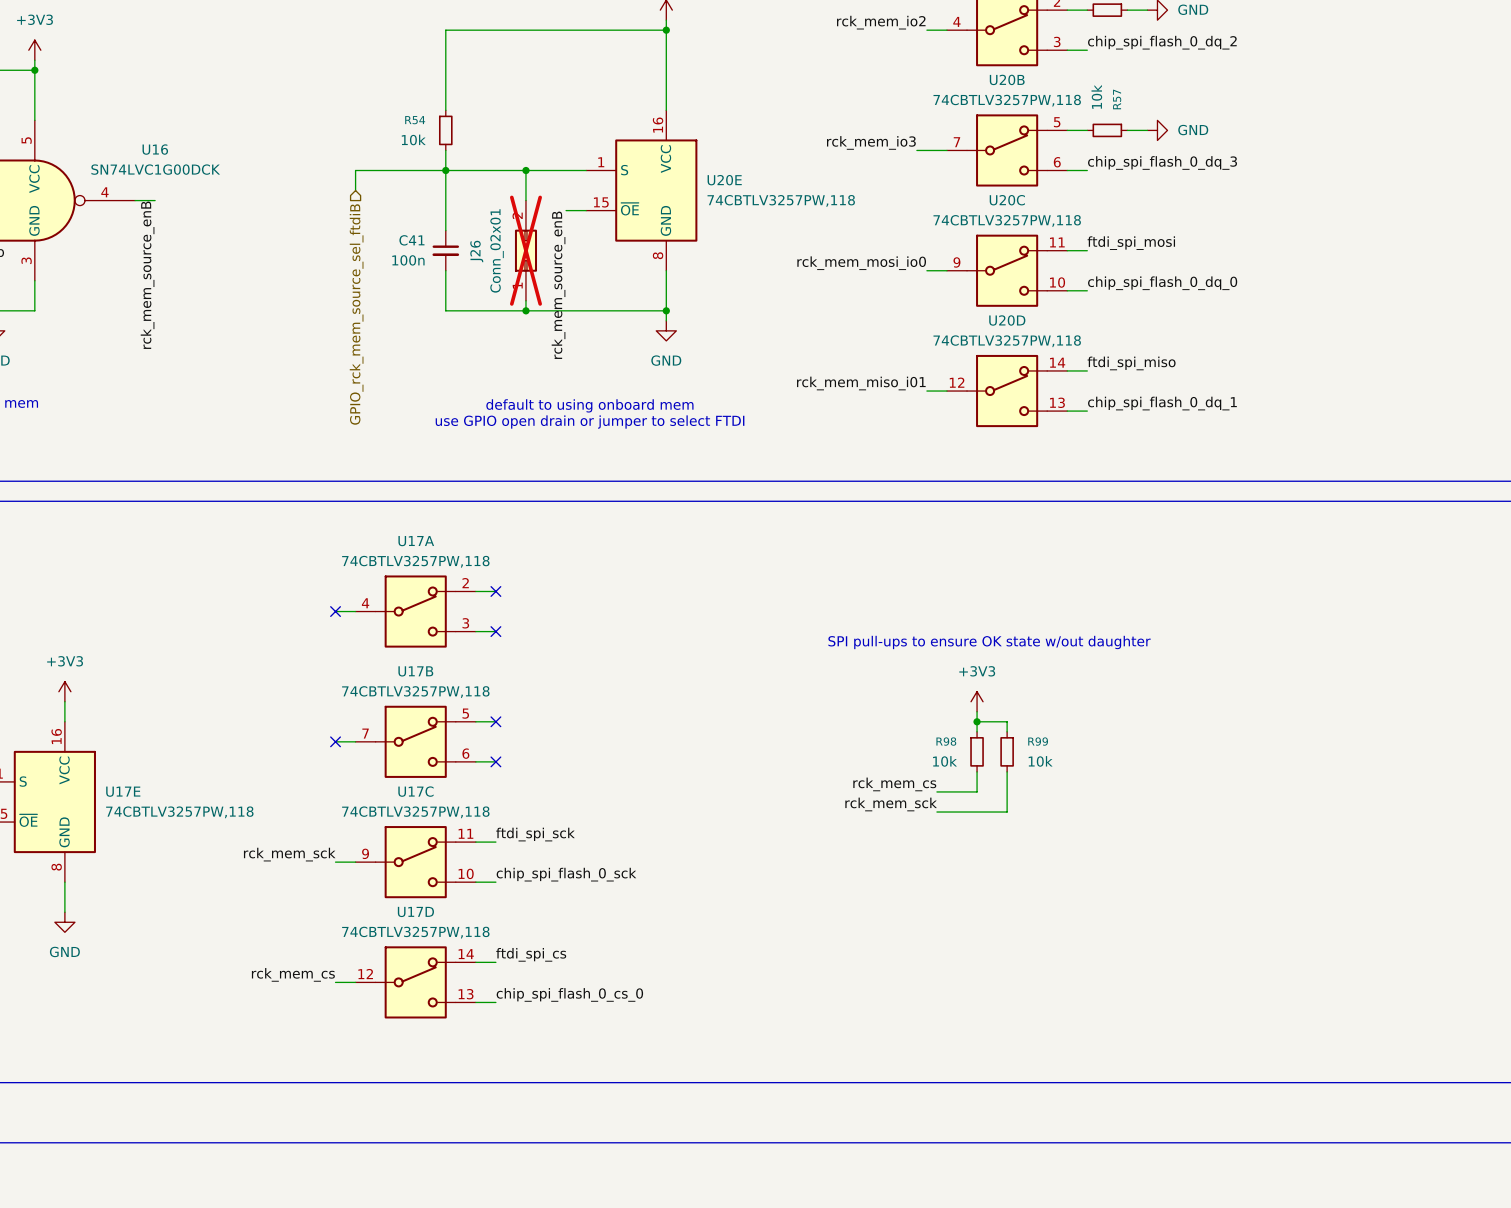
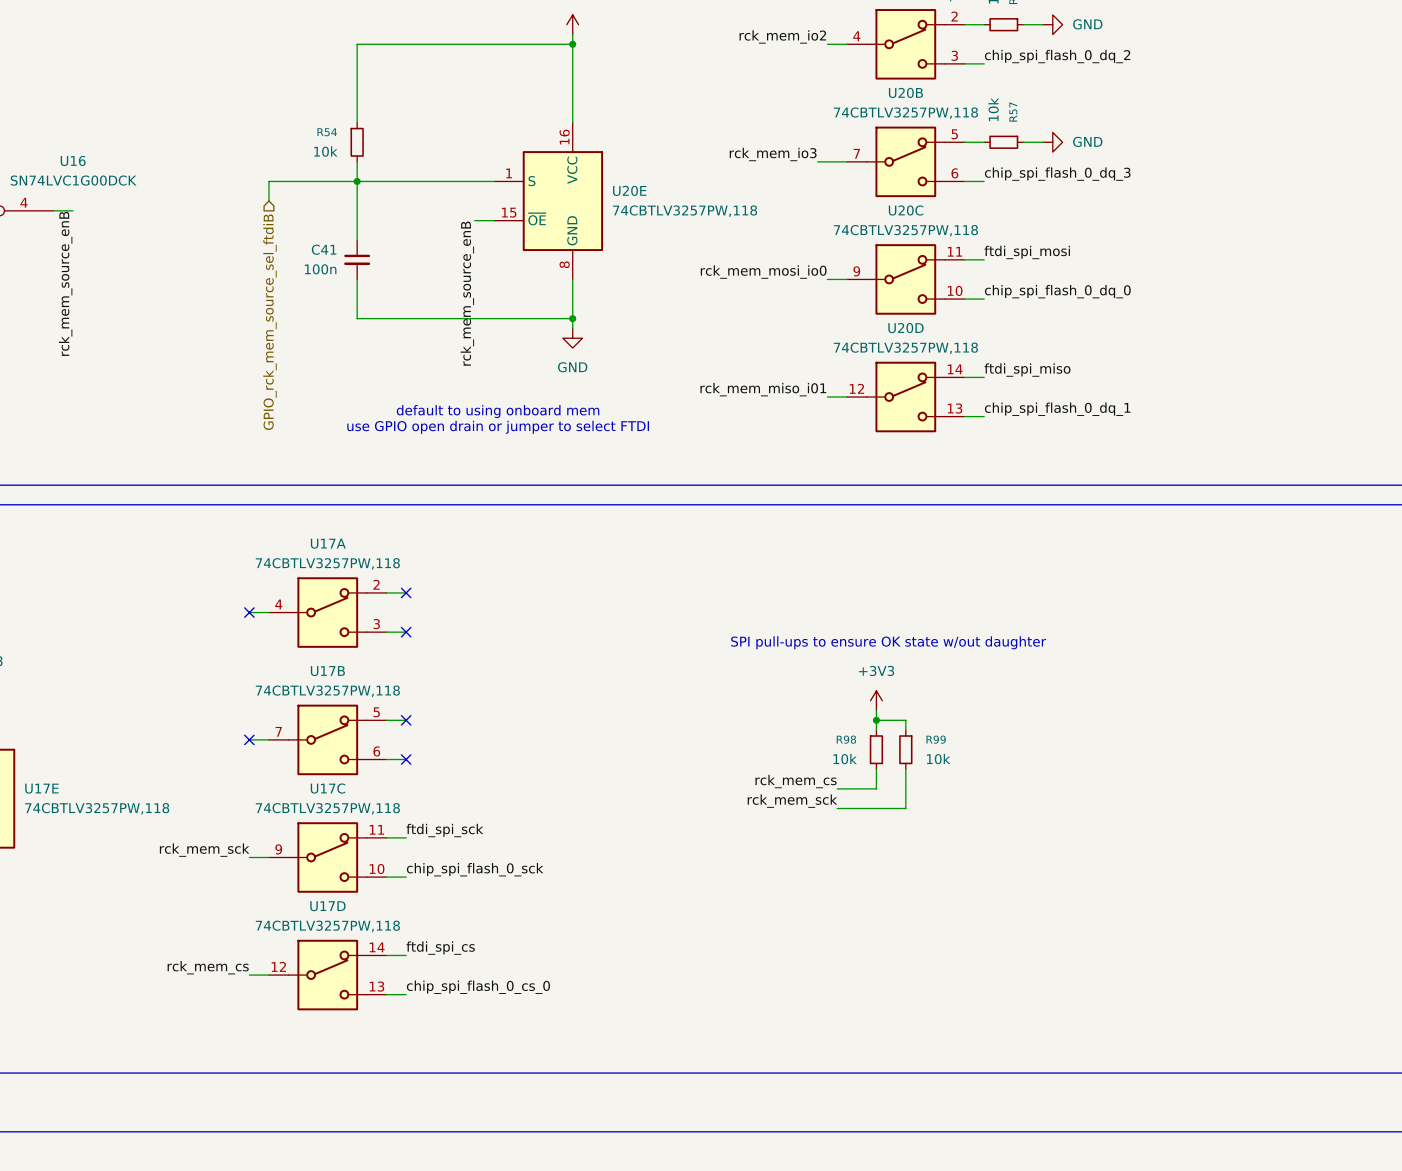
wire: (525, 170) (525, 200) -> none
junction: (525, 170) -> none
J26: Conn_02x01 (525, 250) -> none
wire: (525, 300) (525, 310) -> none
junction: (525, 310) -> none

